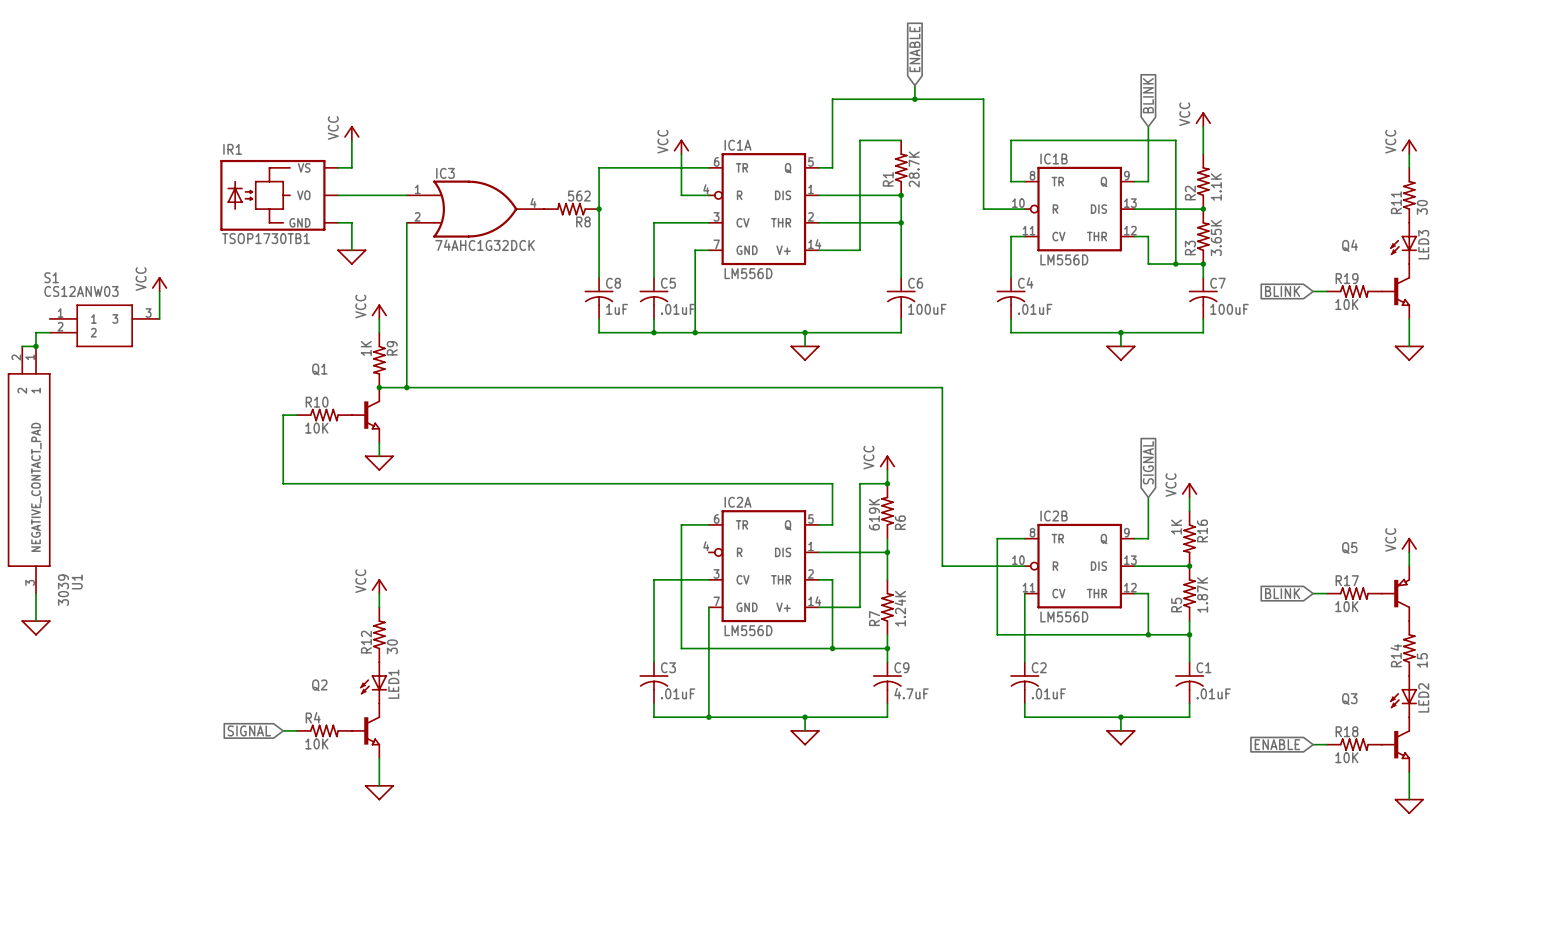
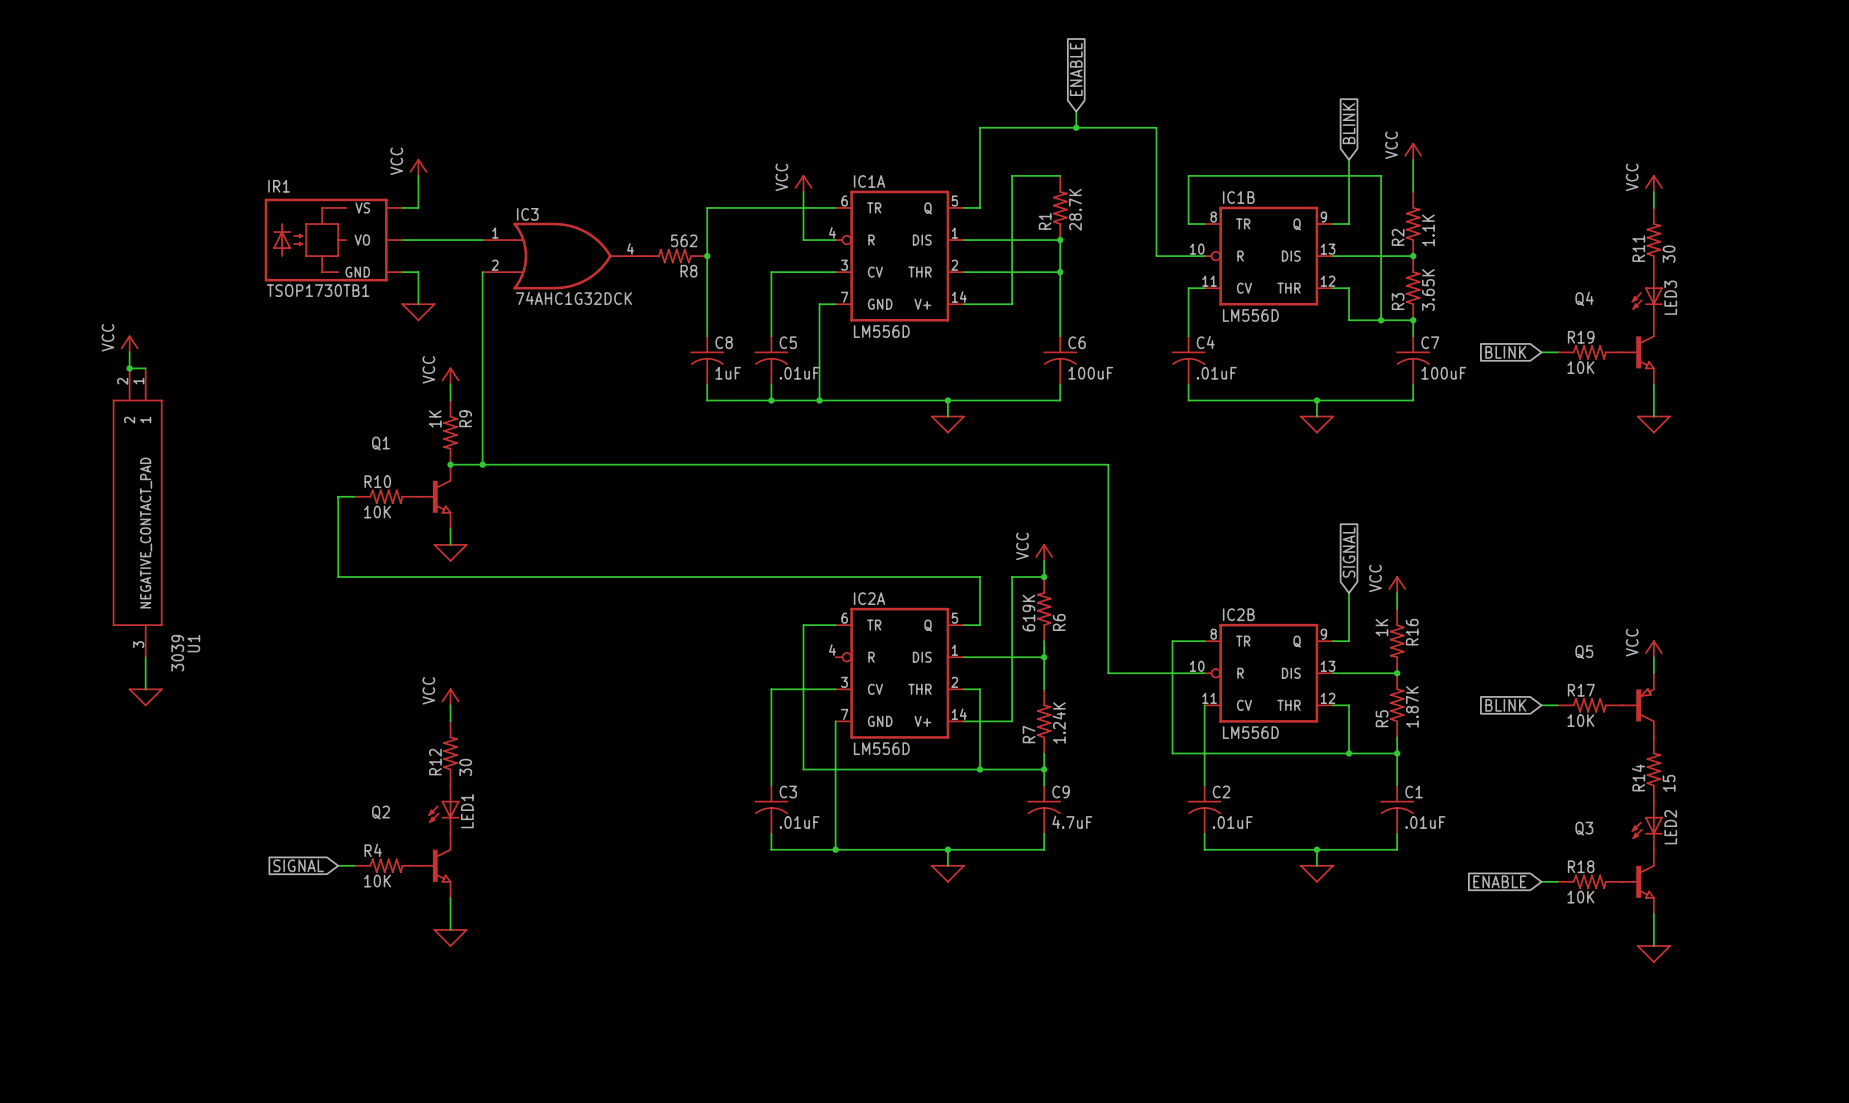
power symbol position: VCC (159, 284) -> VCC (129, 343)
wire: (159, 291) (159, 318) -> none
junction: none -> (129, 368)
S1: CS12ANW03 (104, 325) -> none
wire: (49, 332) (36, 332) (36, 346) (22, 346) -> none
junction: (36, 346) -> none
U1 position: (29, 470) -> (137, 512)
wire: (36, 593) (36, 621) -> (145, 657) (145, 689)
power symbol position: (36, 627) -> (145, 697)

